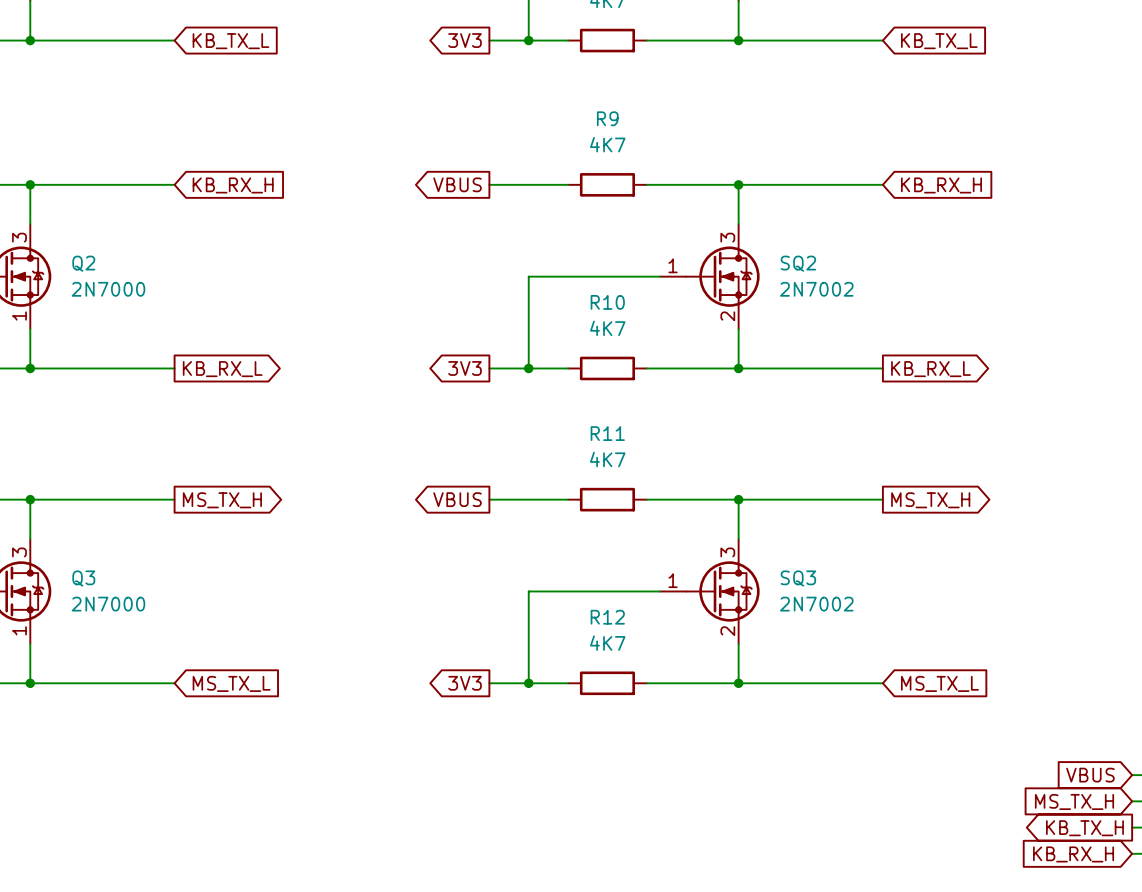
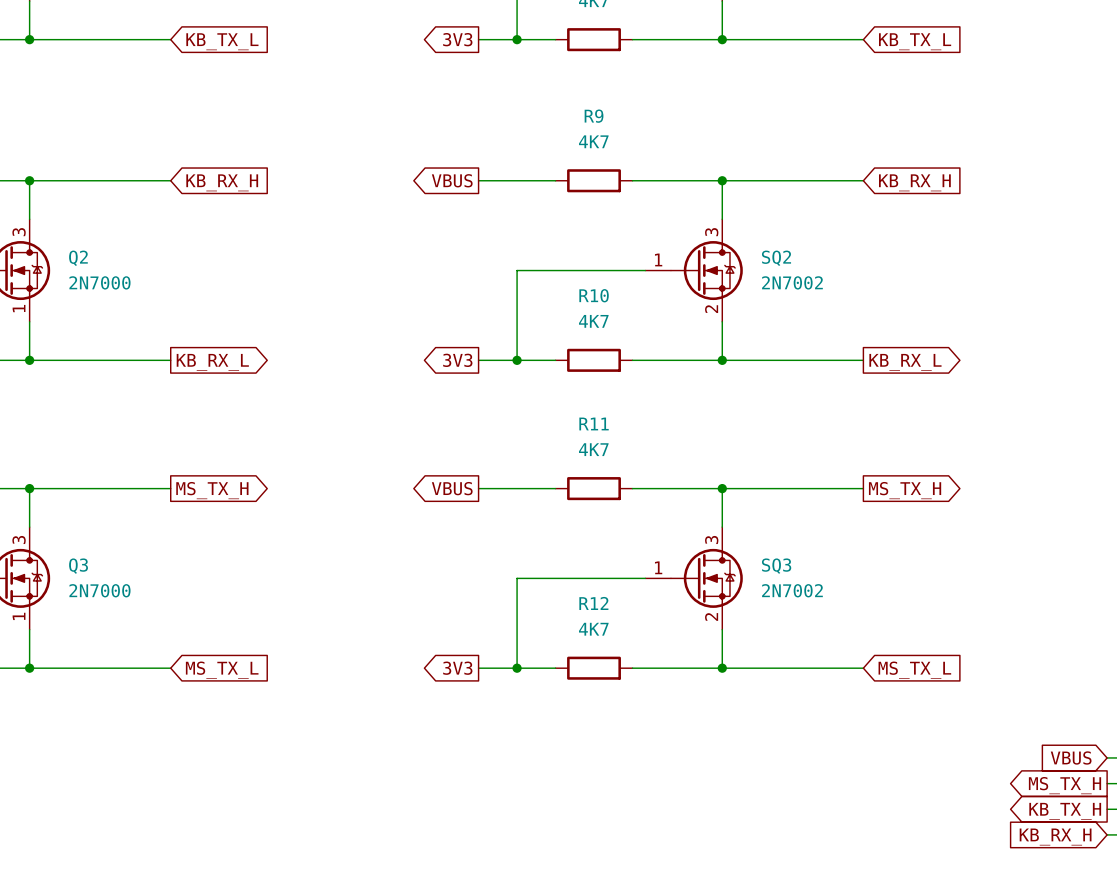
global label shape: input (1074, 801) -> output (1065, 785)

